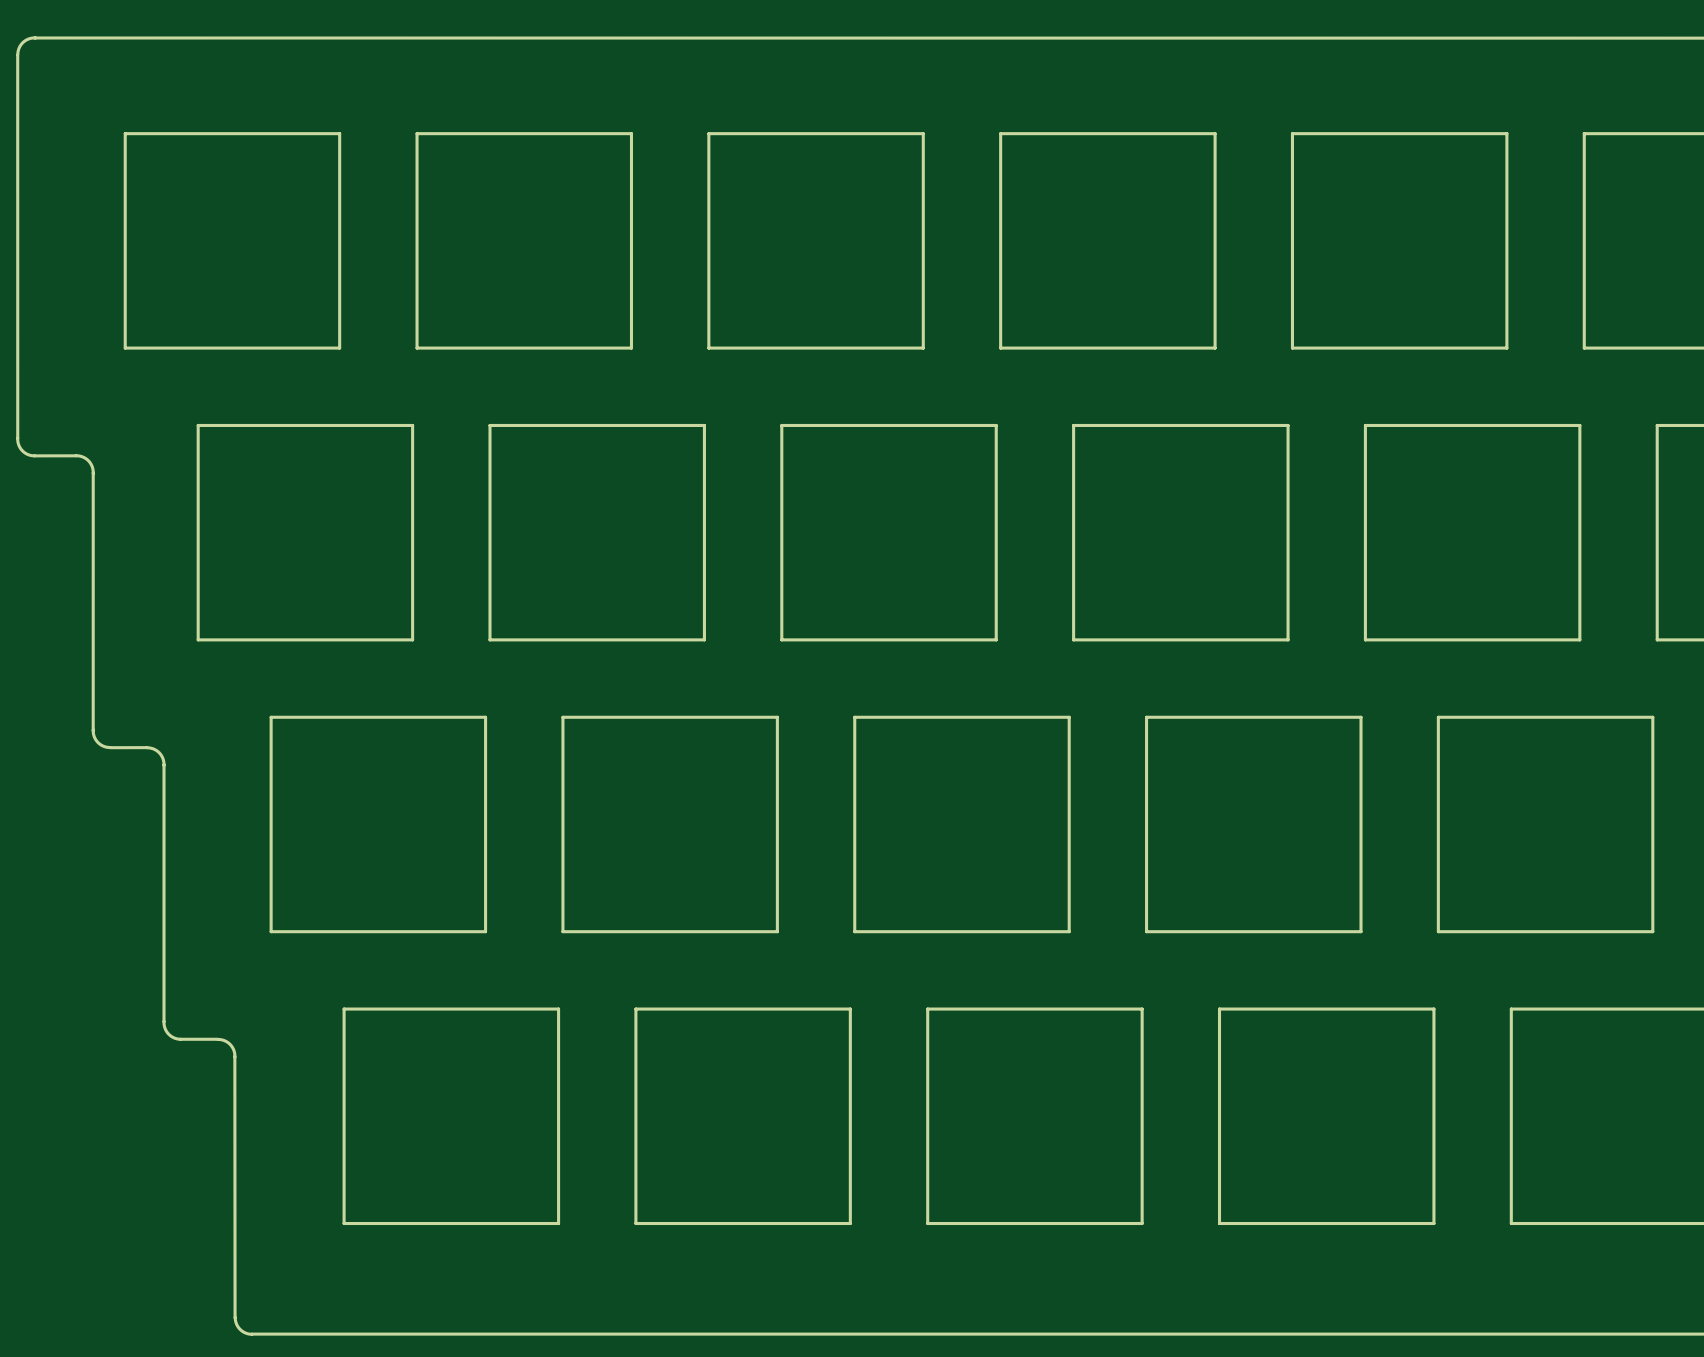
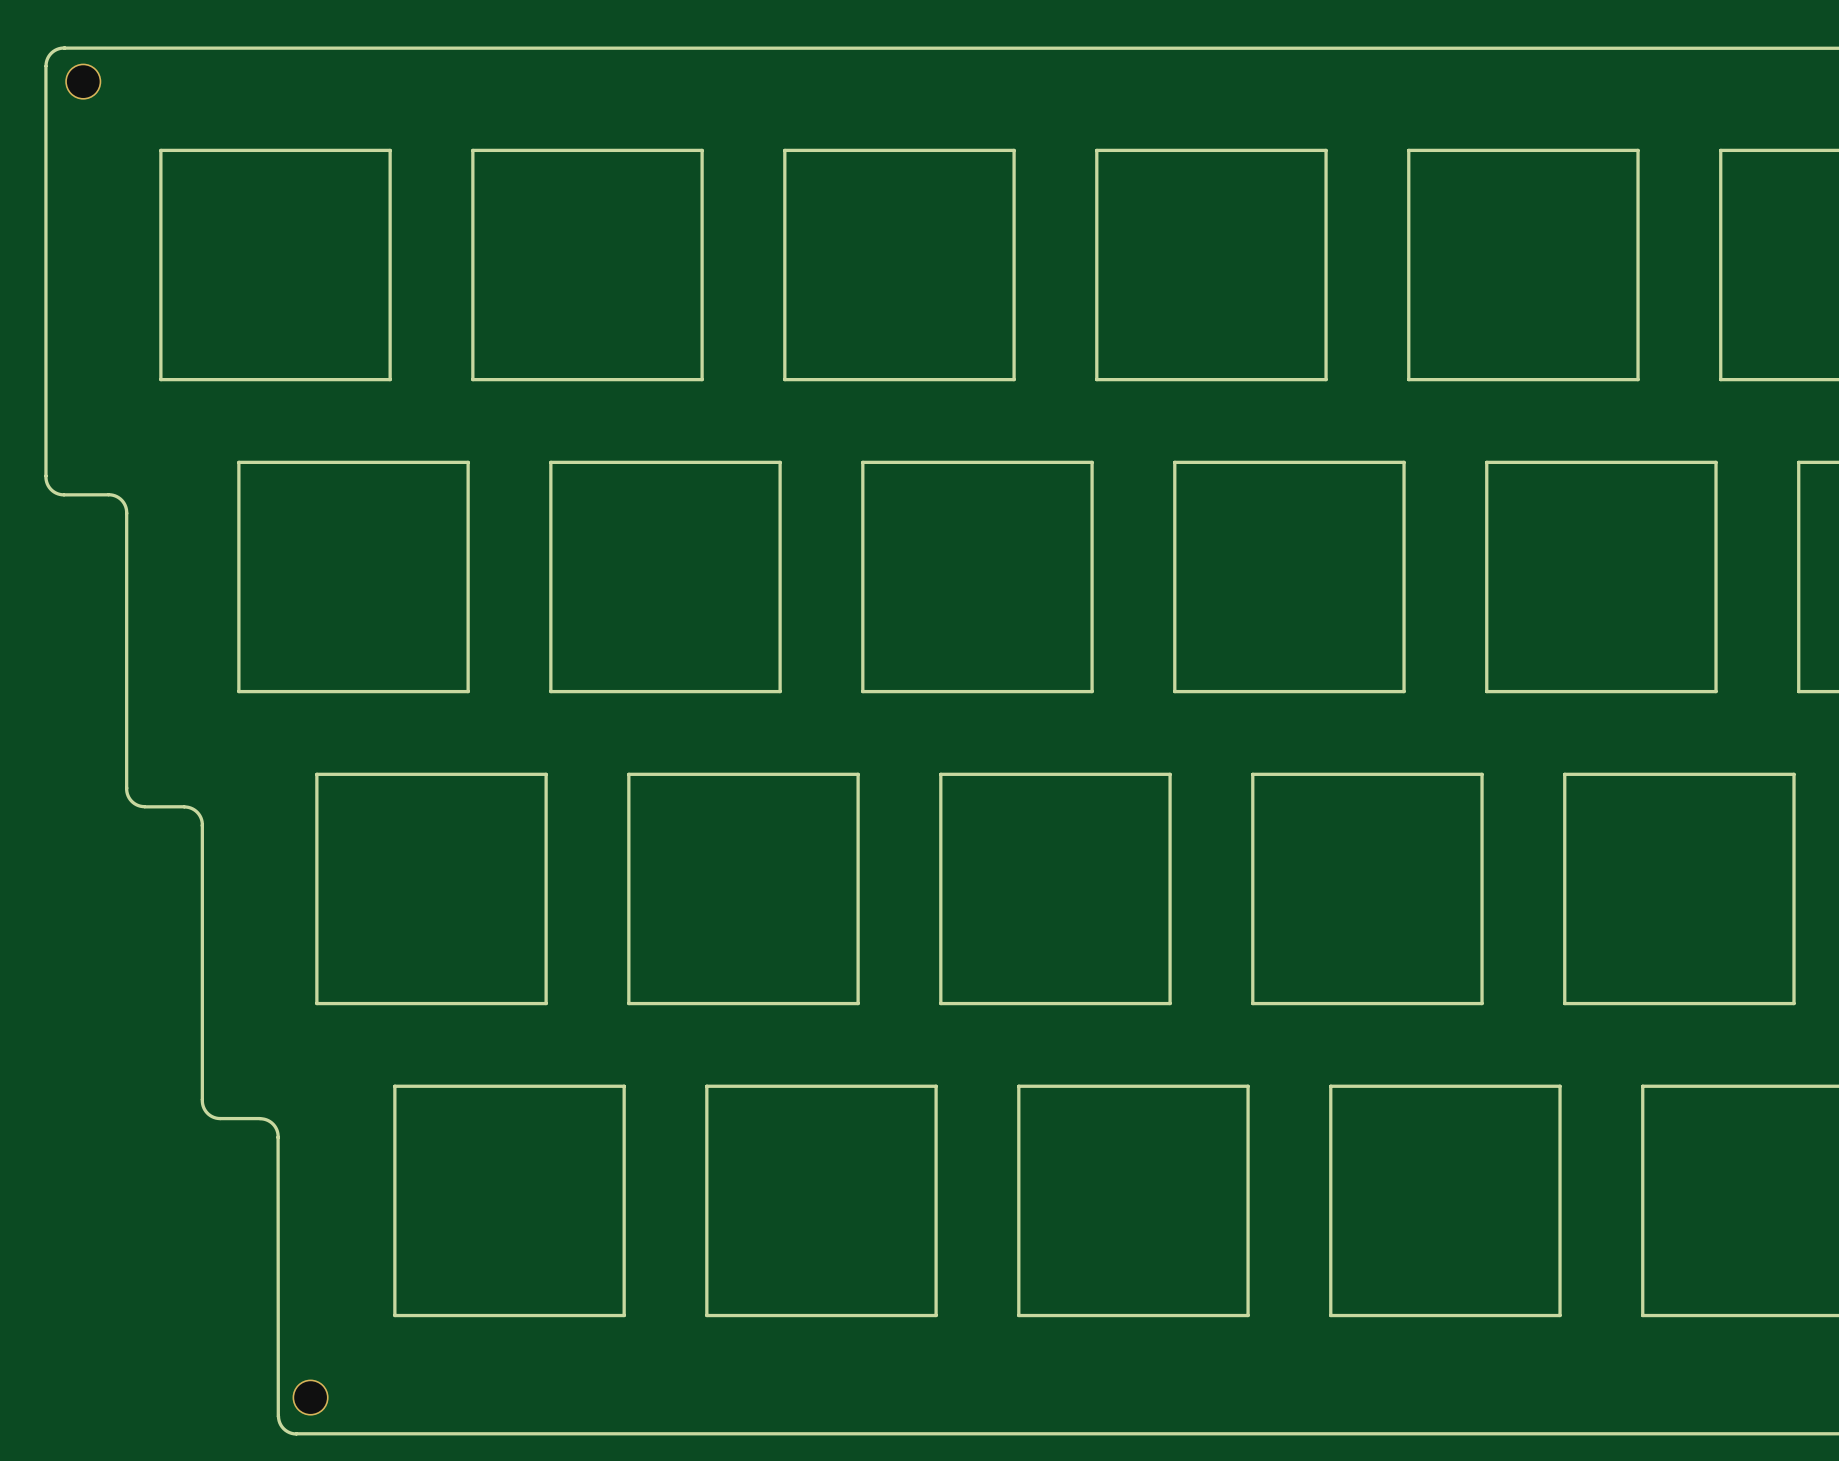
part: none -> (83, 81)
part: none -> (310, 1397)

